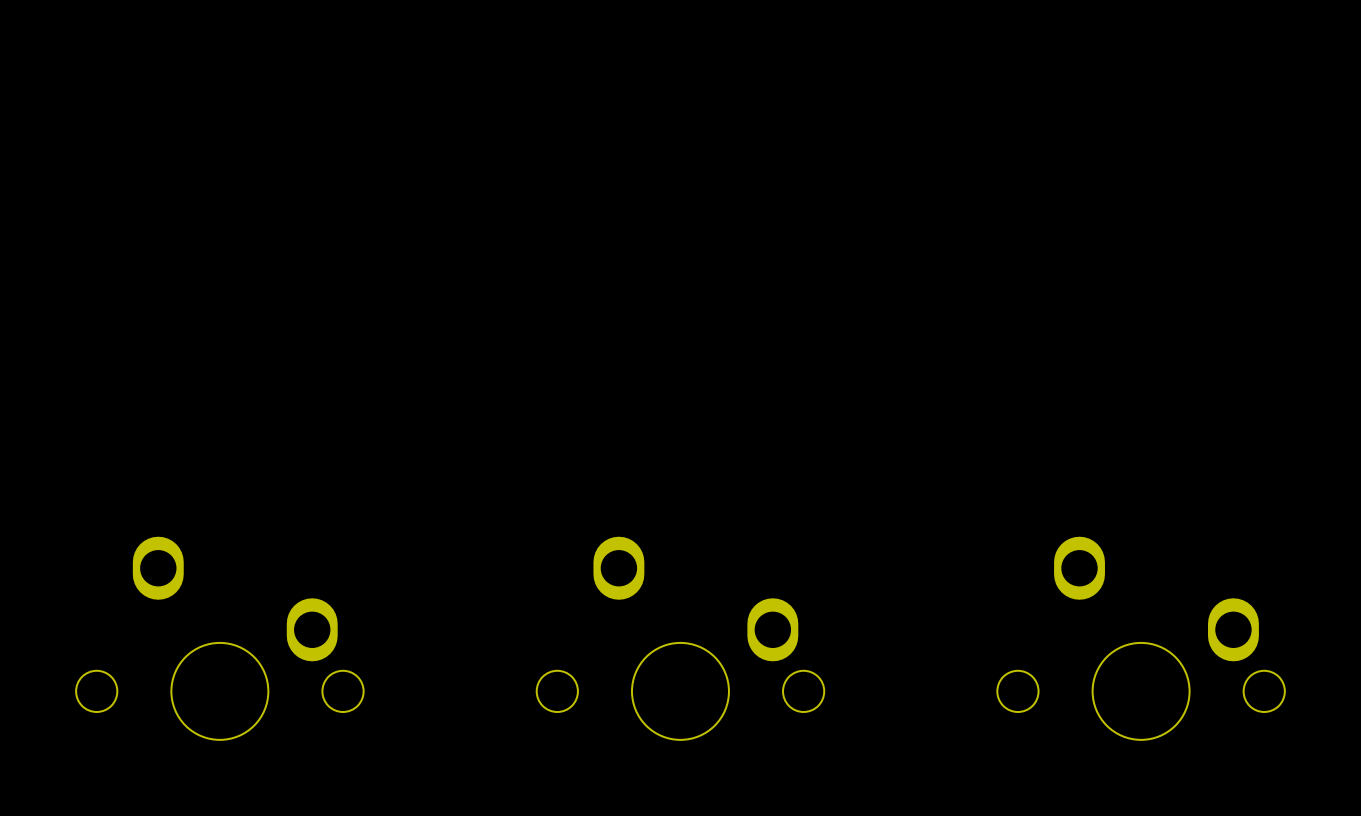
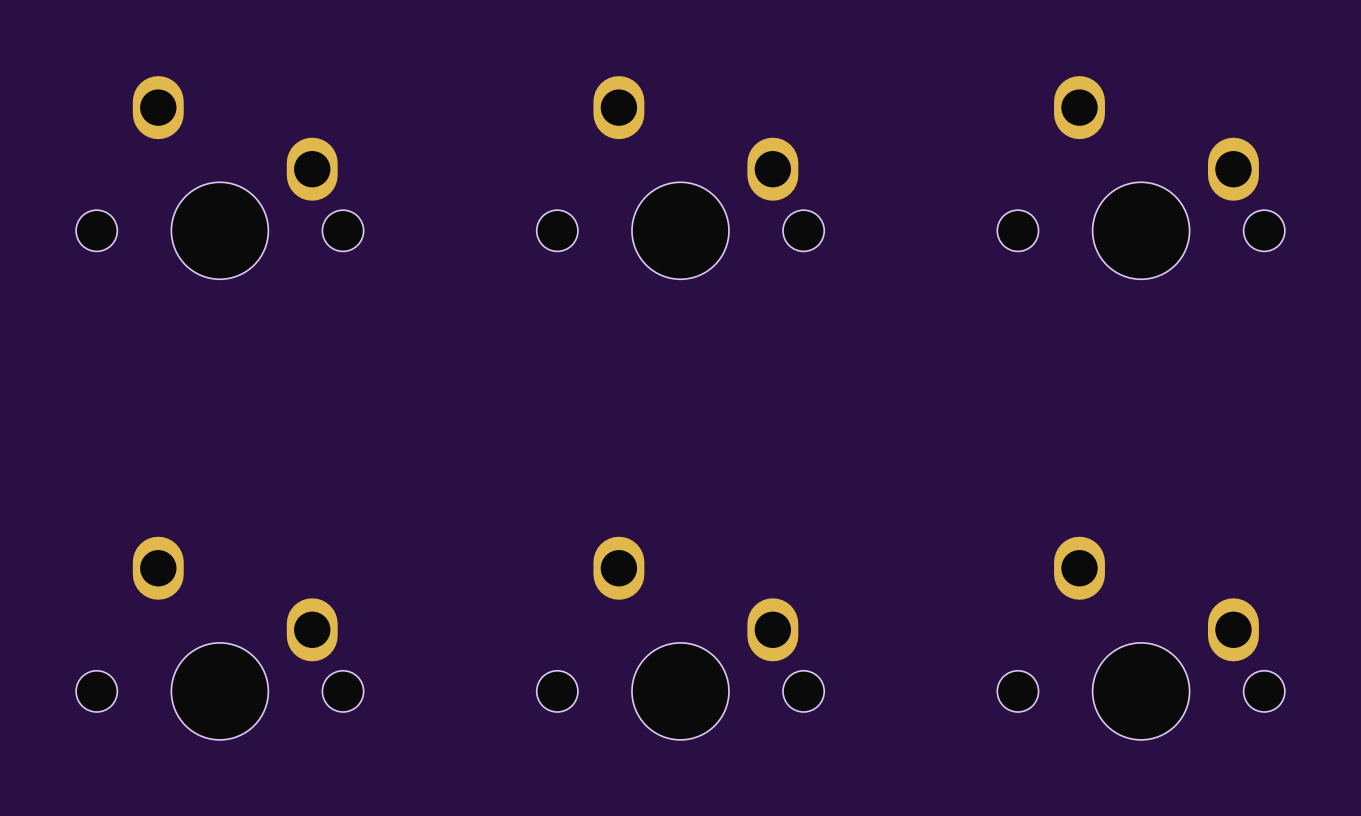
part: none -> (219, 177)
part: none -> (680, 177)
part: none -> (1141, 177)

